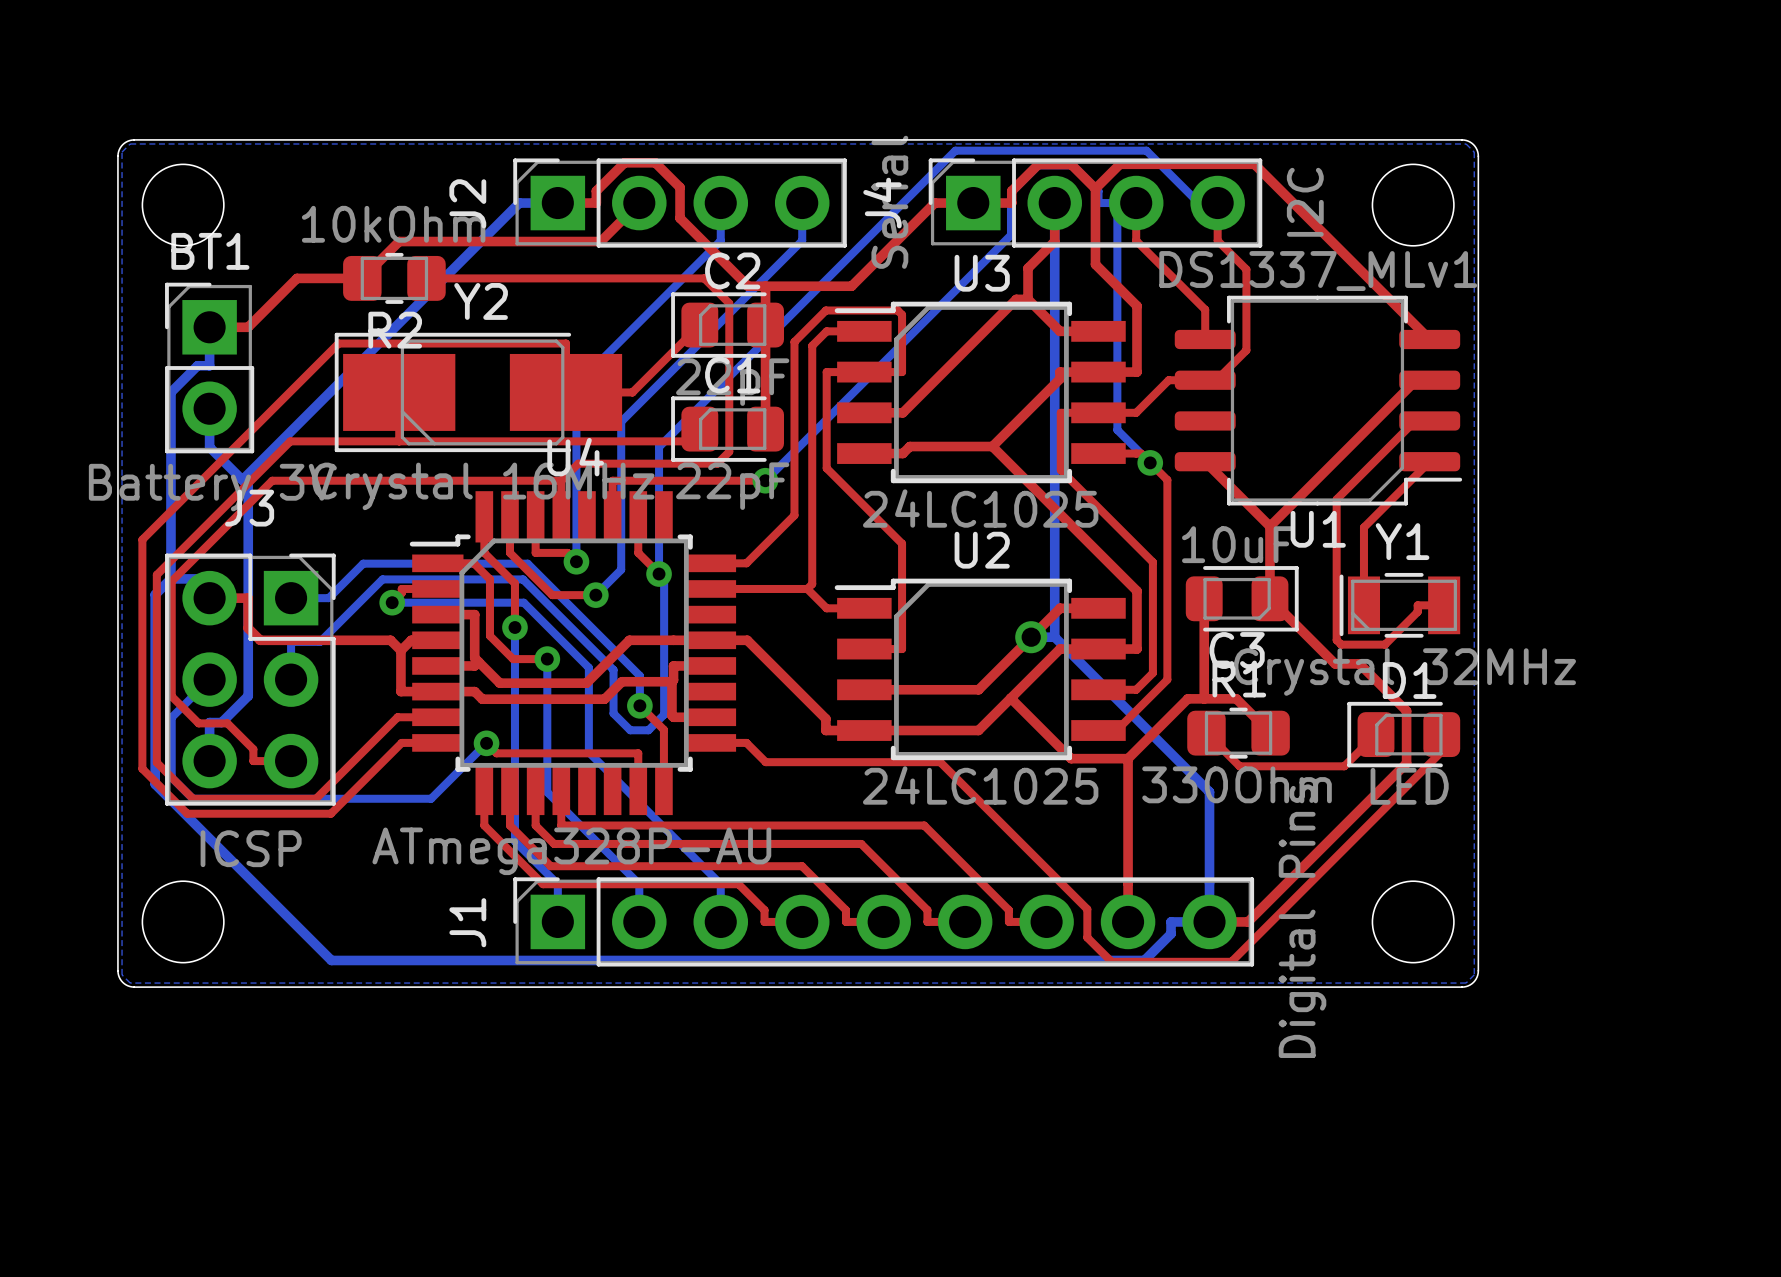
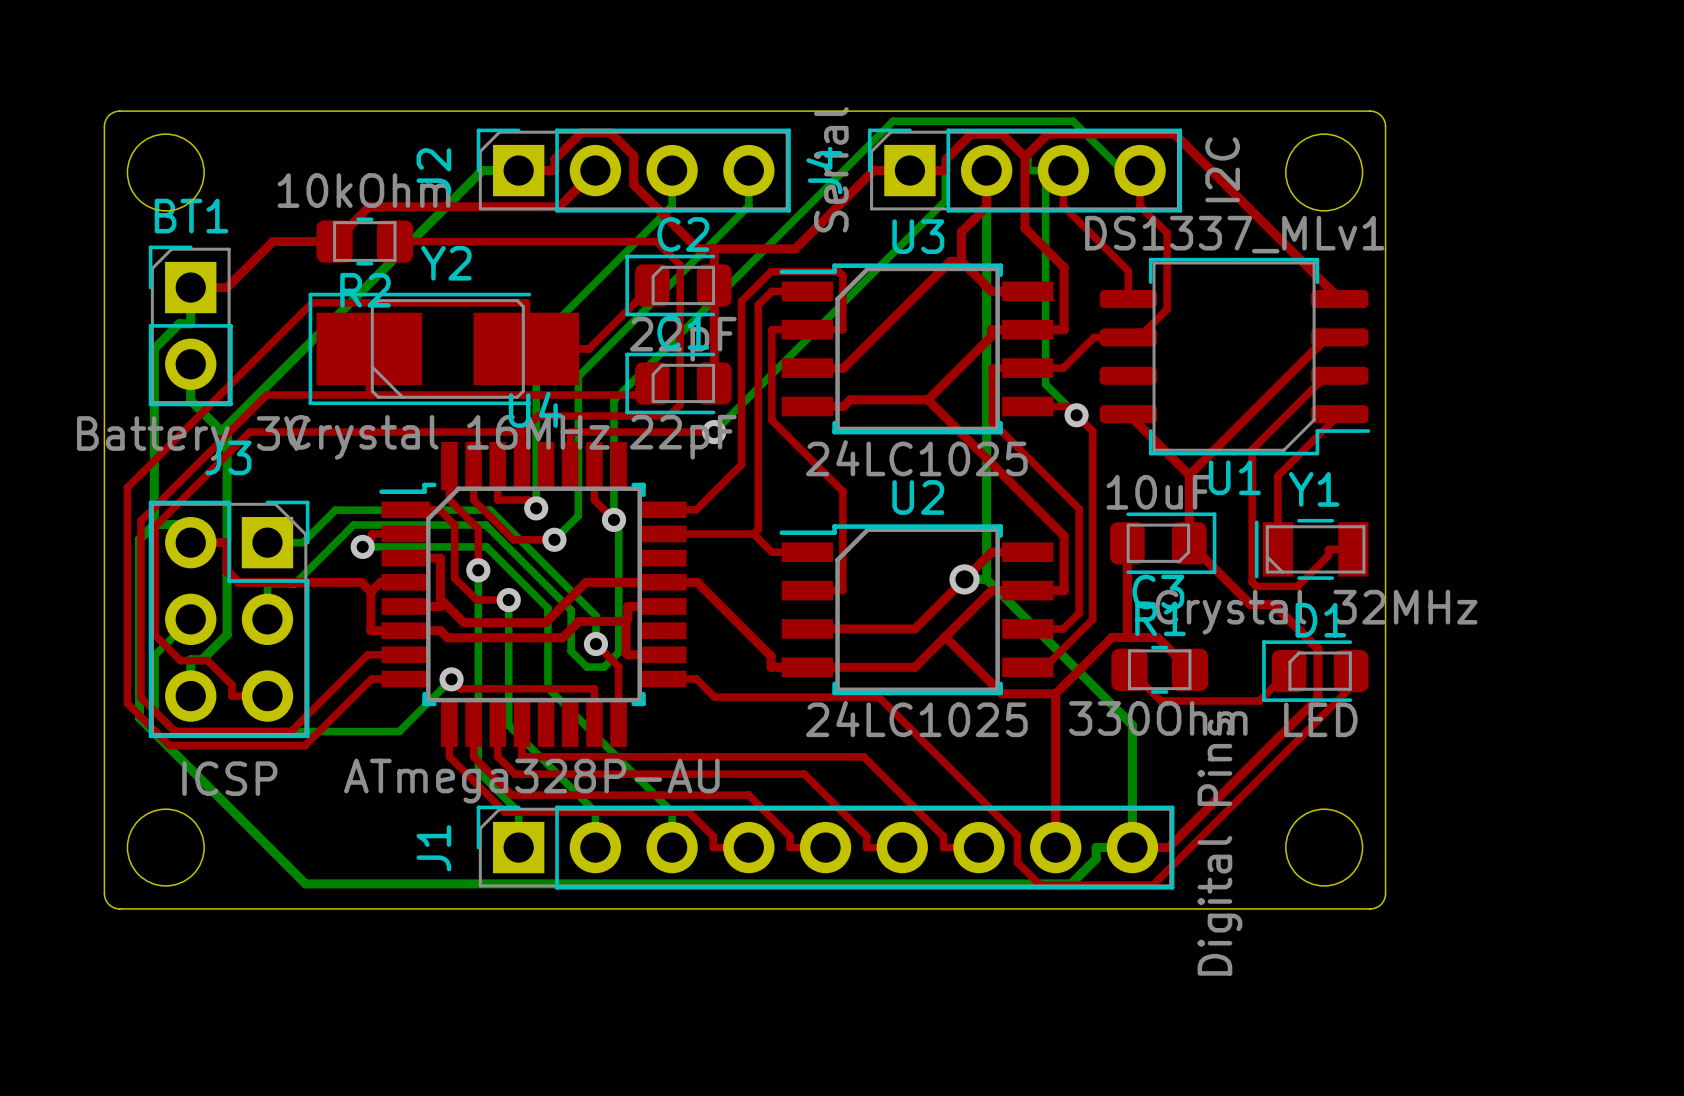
bottom zone outline: (130, 143) (122, 152) (122, 974) (130, 983) (1466, 983) (1474, 974) (1474, 152) (1466, 143) (130, 143) -> none

